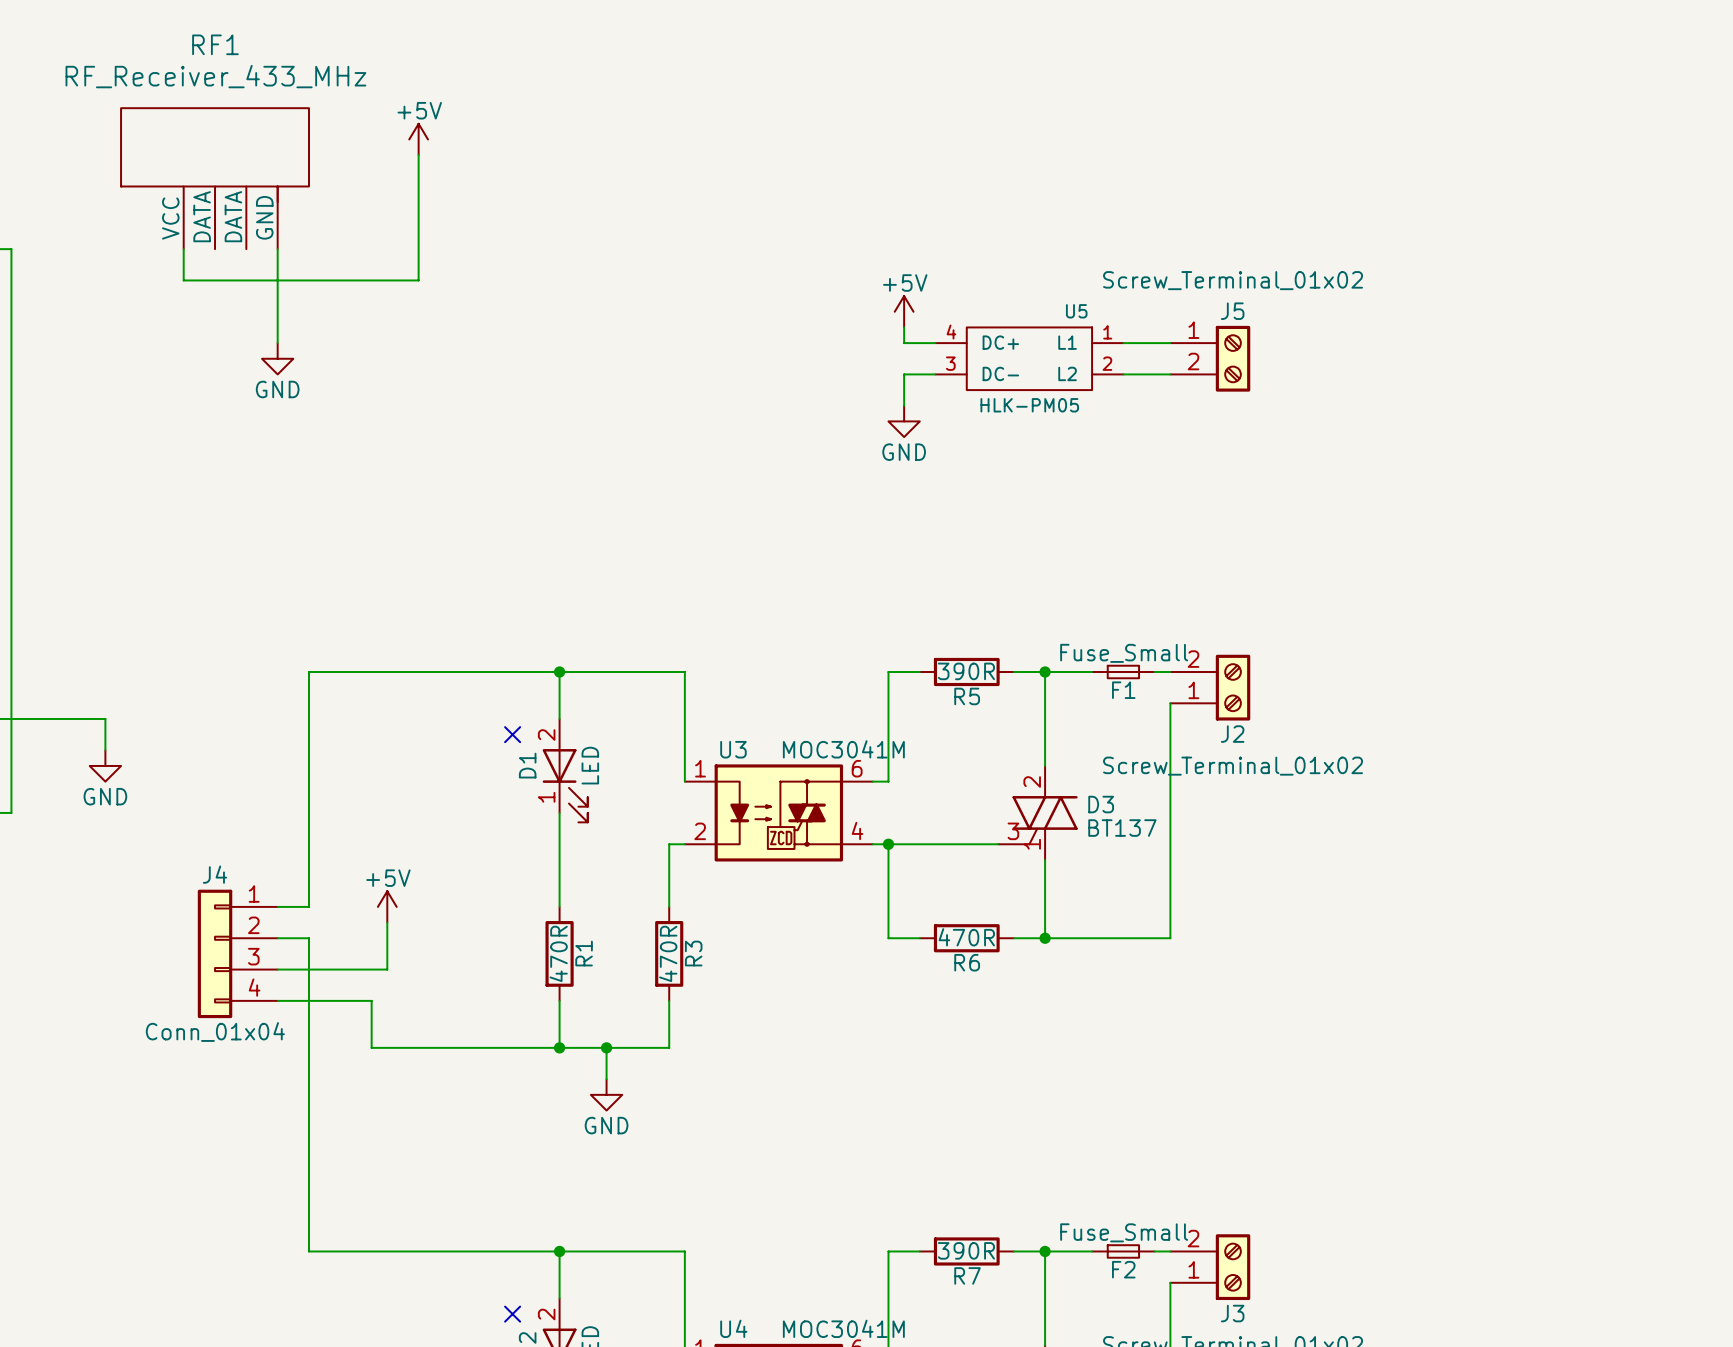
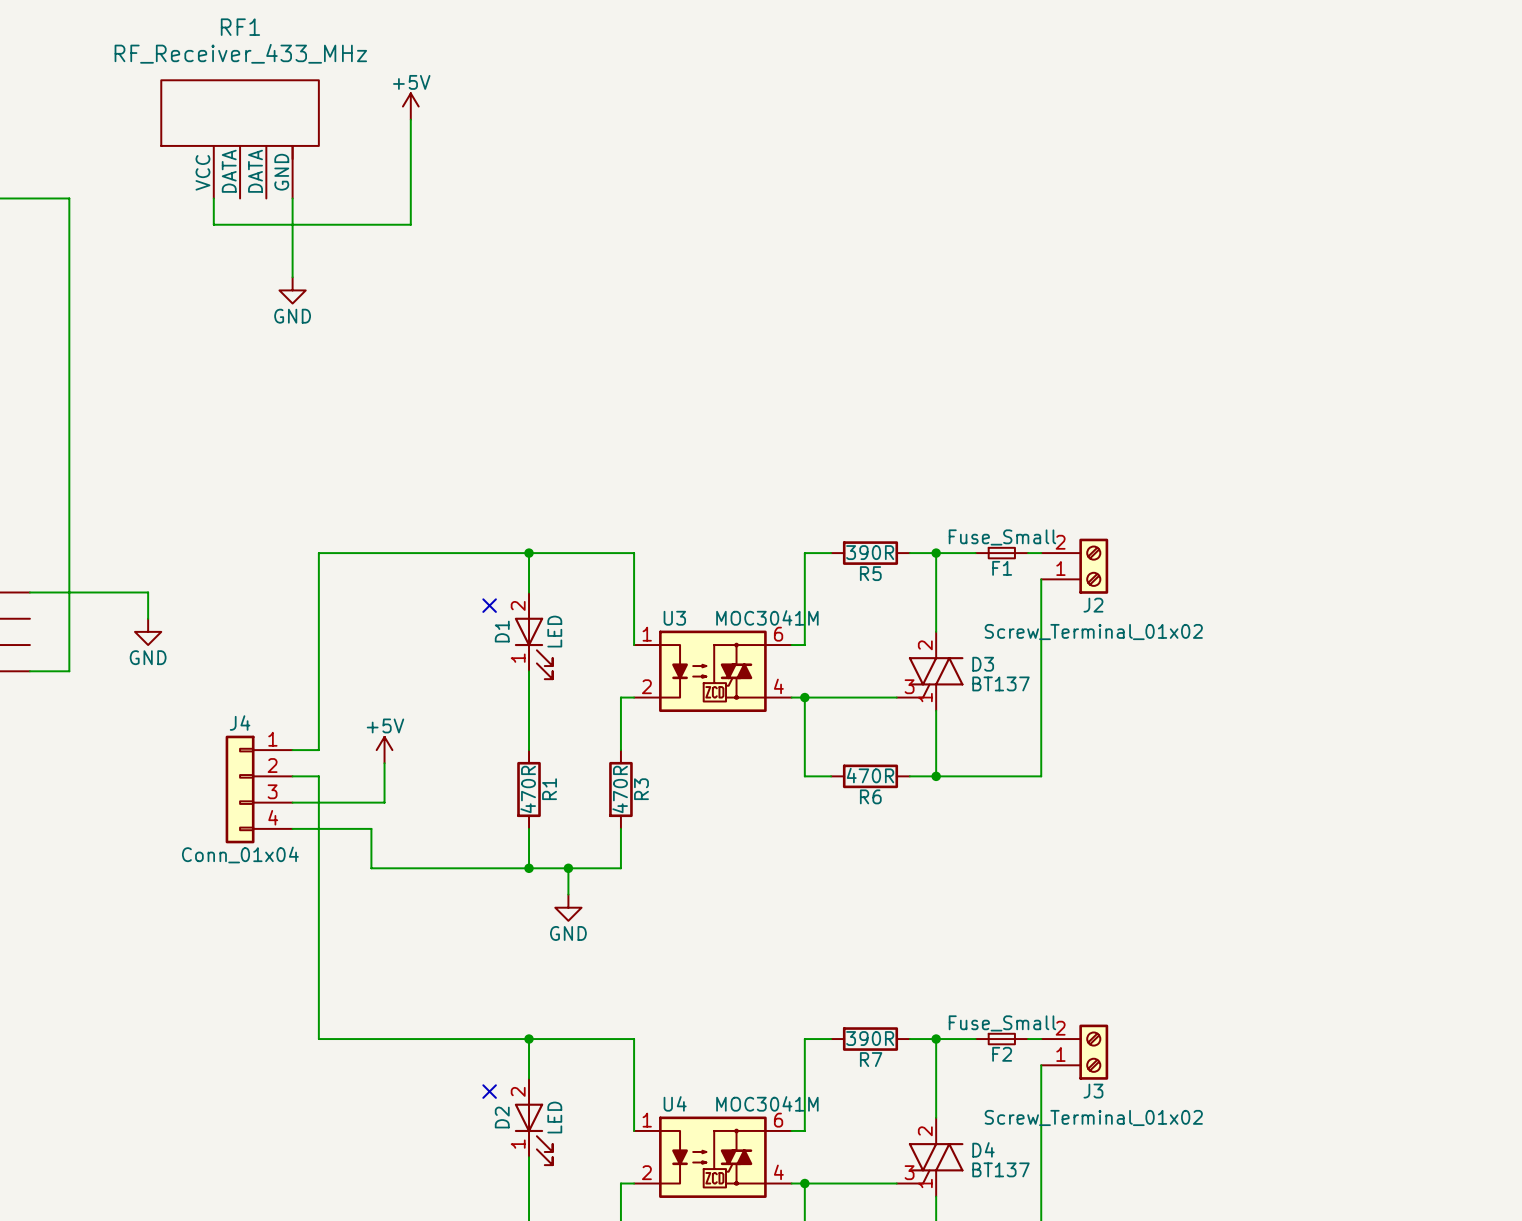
power symbol: +5V (904, 311) -> none
wire: (904, 327) (904, 343) (935, 343) -> none
wire: (1123, 343) (1170, 343) -> none
U5: HLK-PM05 (1029, 358) -> none
J5: Screw_Terminal_01x02 (1210, 358) -> none
wire: (935, 374) (904, 374) (904, 405) -> none
wire: (1123, 374) (1170, 374) -> none
power symbol: GND (904, 421) -> none

